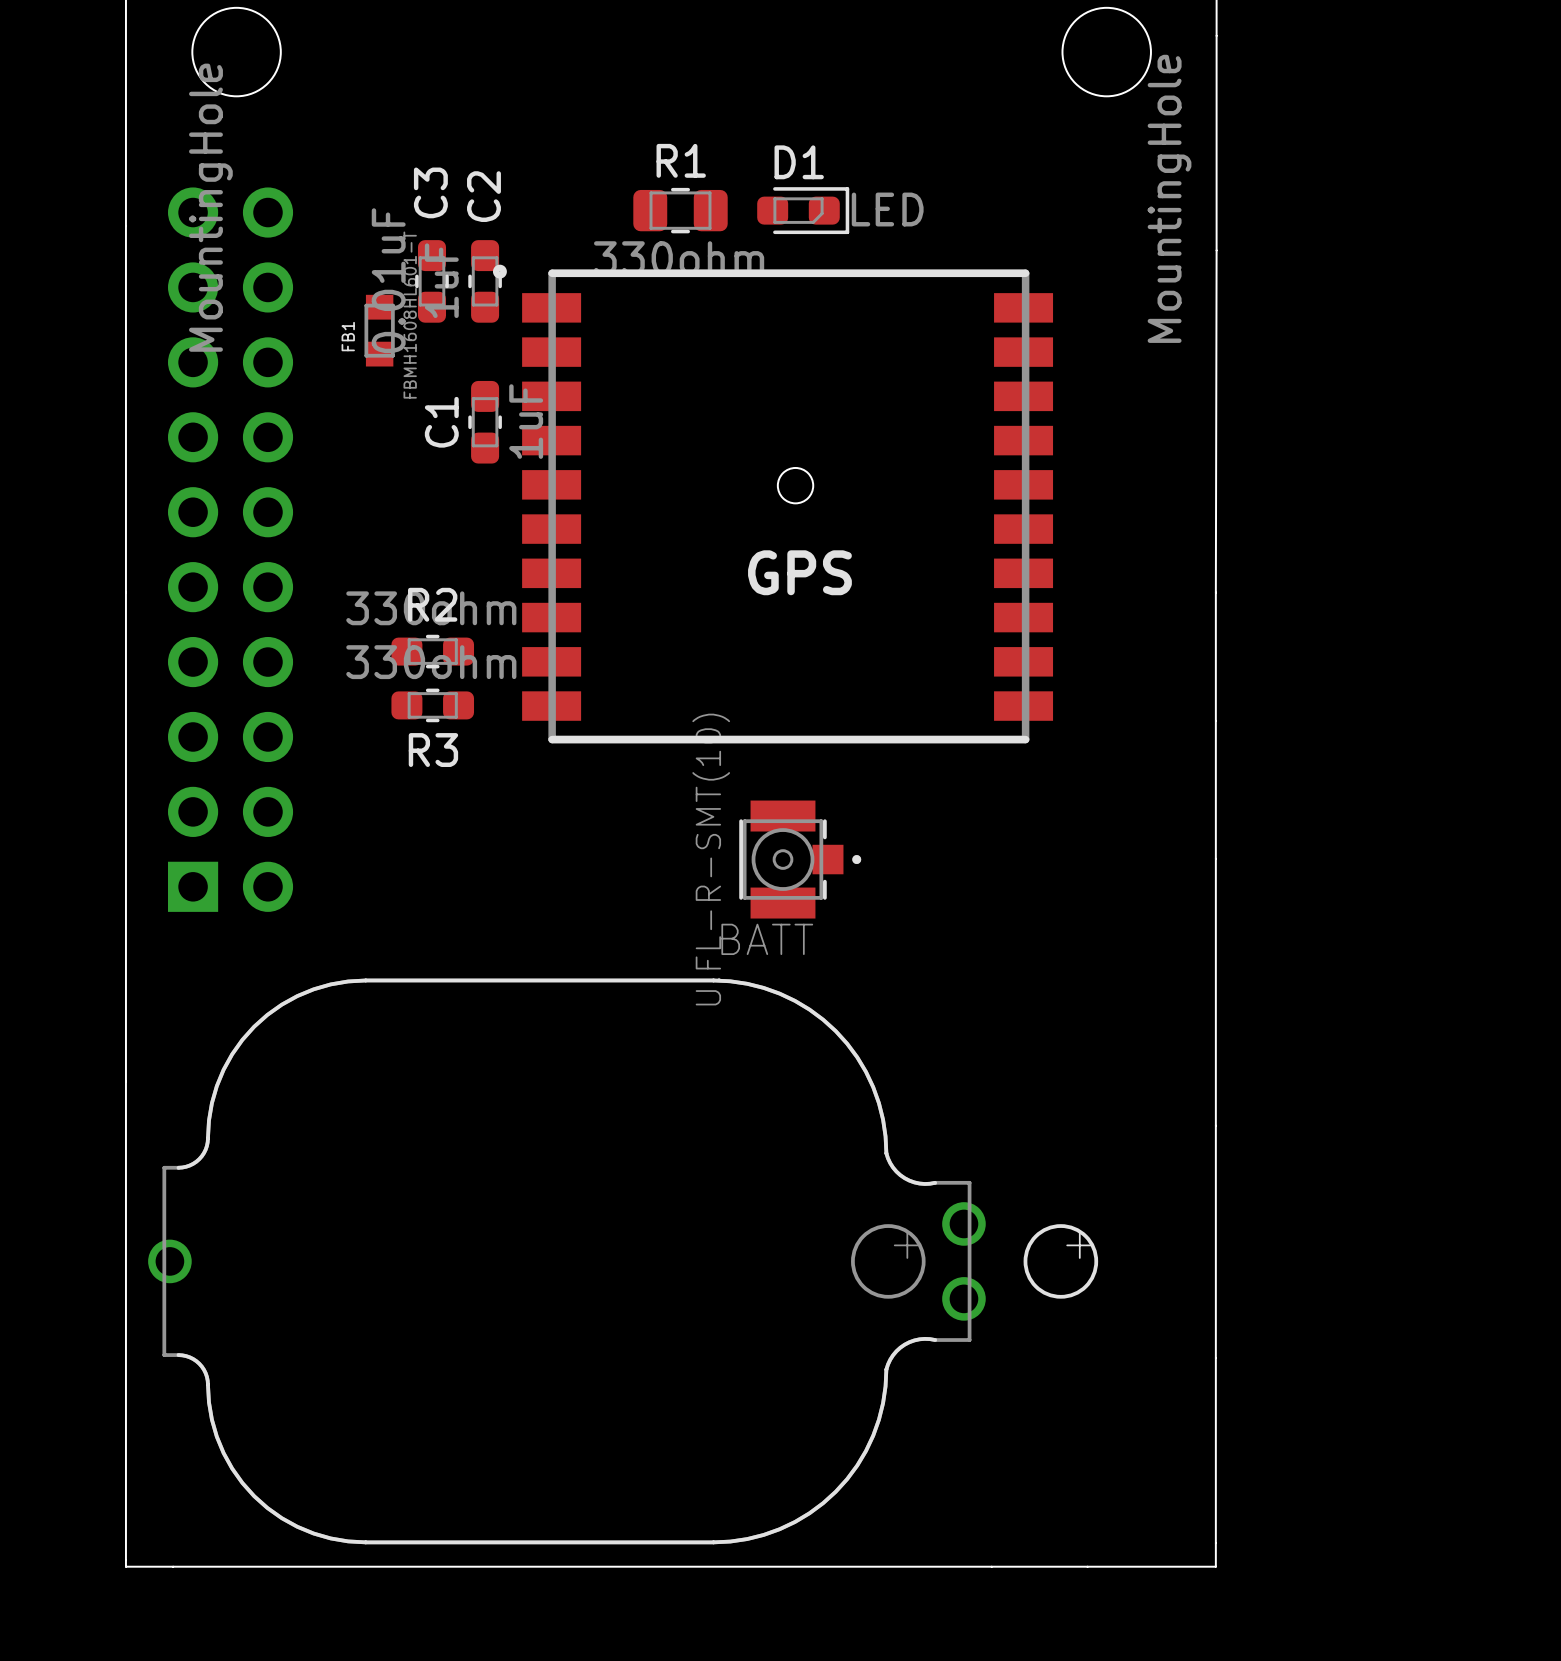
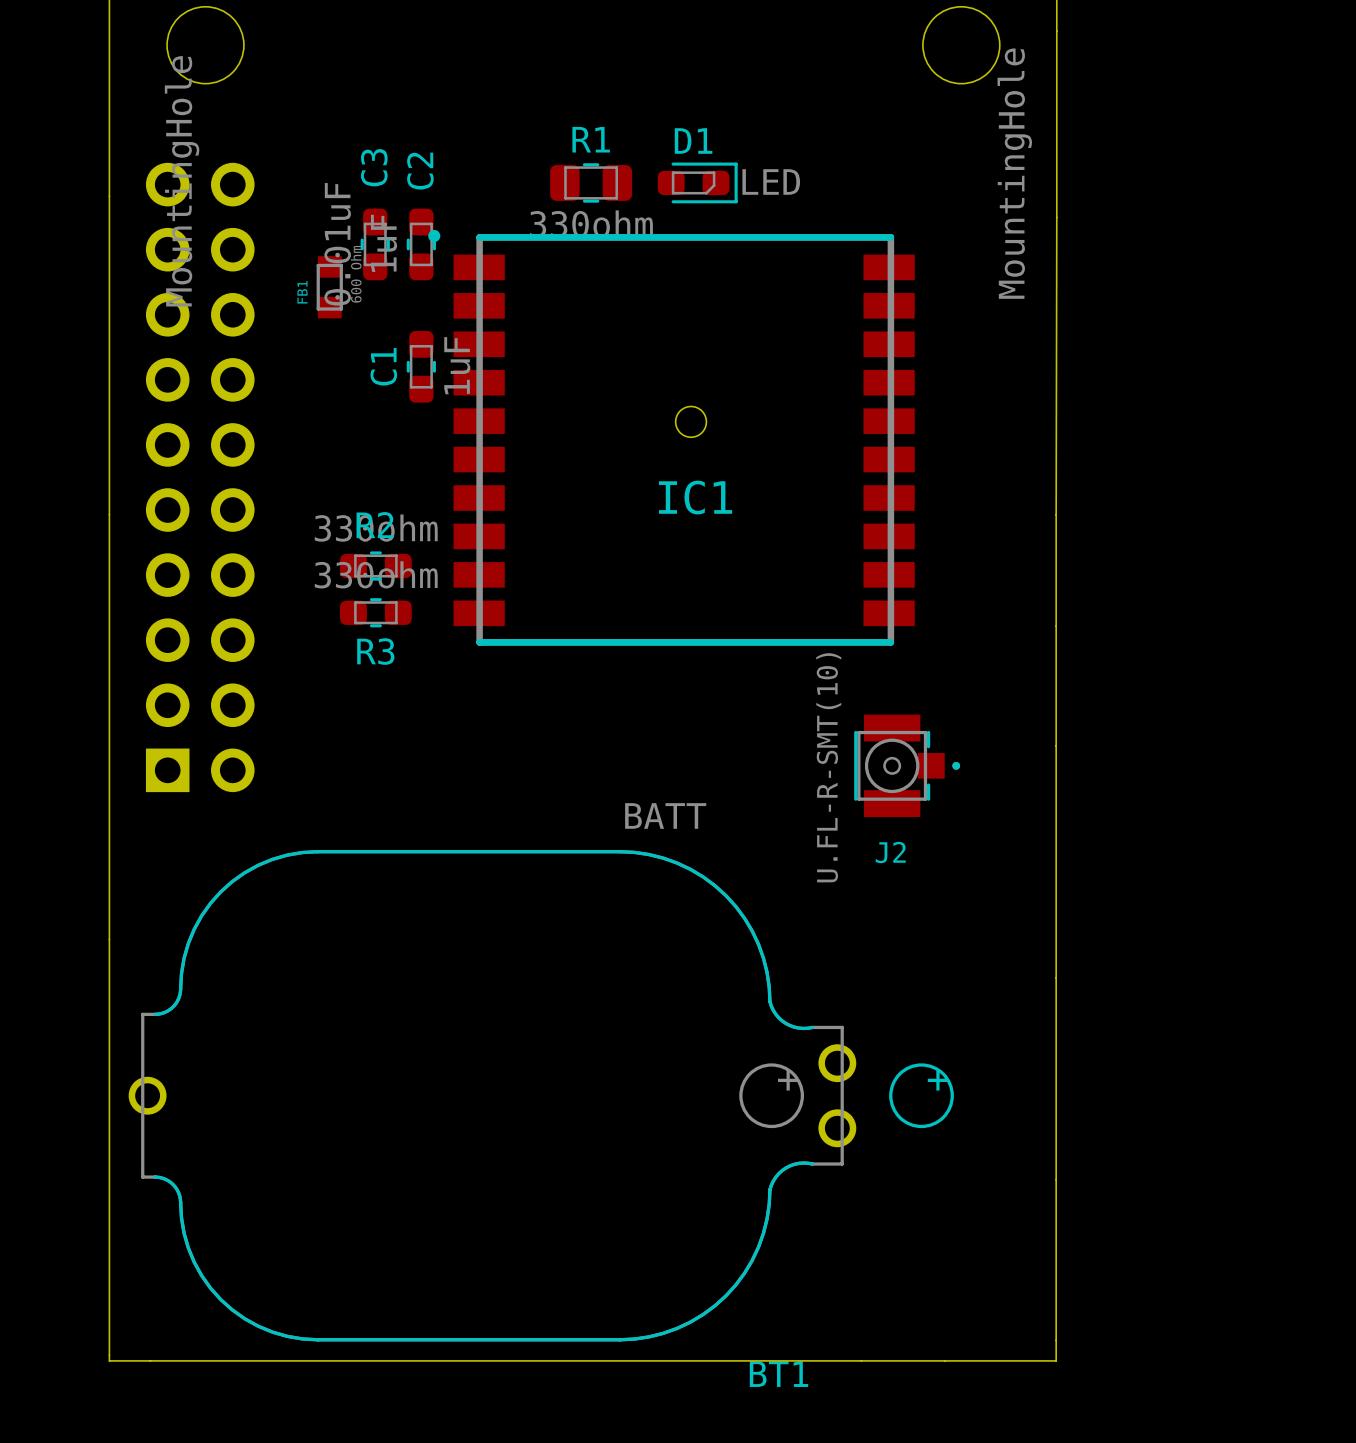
FB1 value: FBMH1608HL601-T (410, 315) -> 600 Ohm (356, 274)
GPS name: GPS (799, 572) -> IC1 (695, 497)
part: U.FL-R-SMT(10) (800, 859) -> none
J2: none -> U.FL-R-SMT(10) (907, 765)
BT1 name: none -> BT1 (778, 1374)

